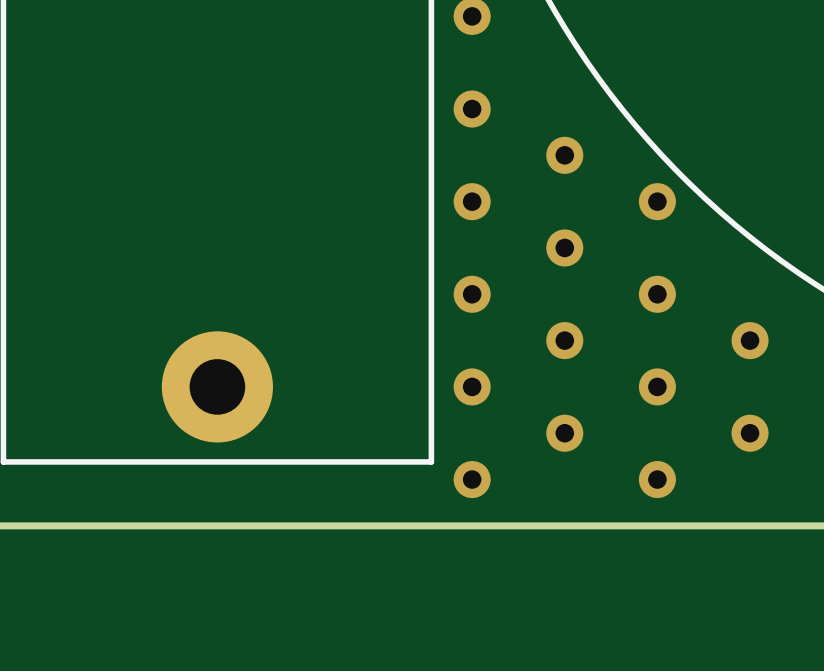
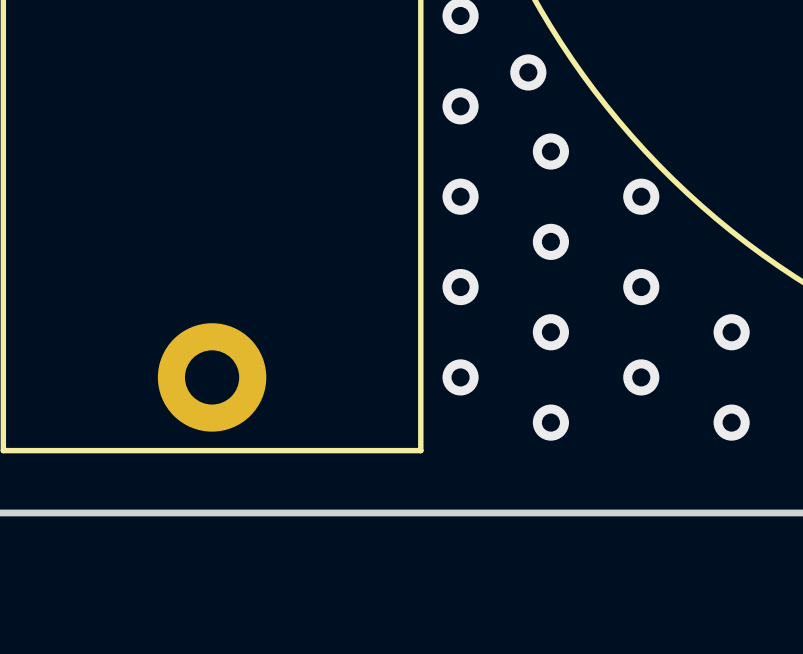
via: none -> (528, 72)
via: (472, 479) -> none
via: (657, 479) -> none

